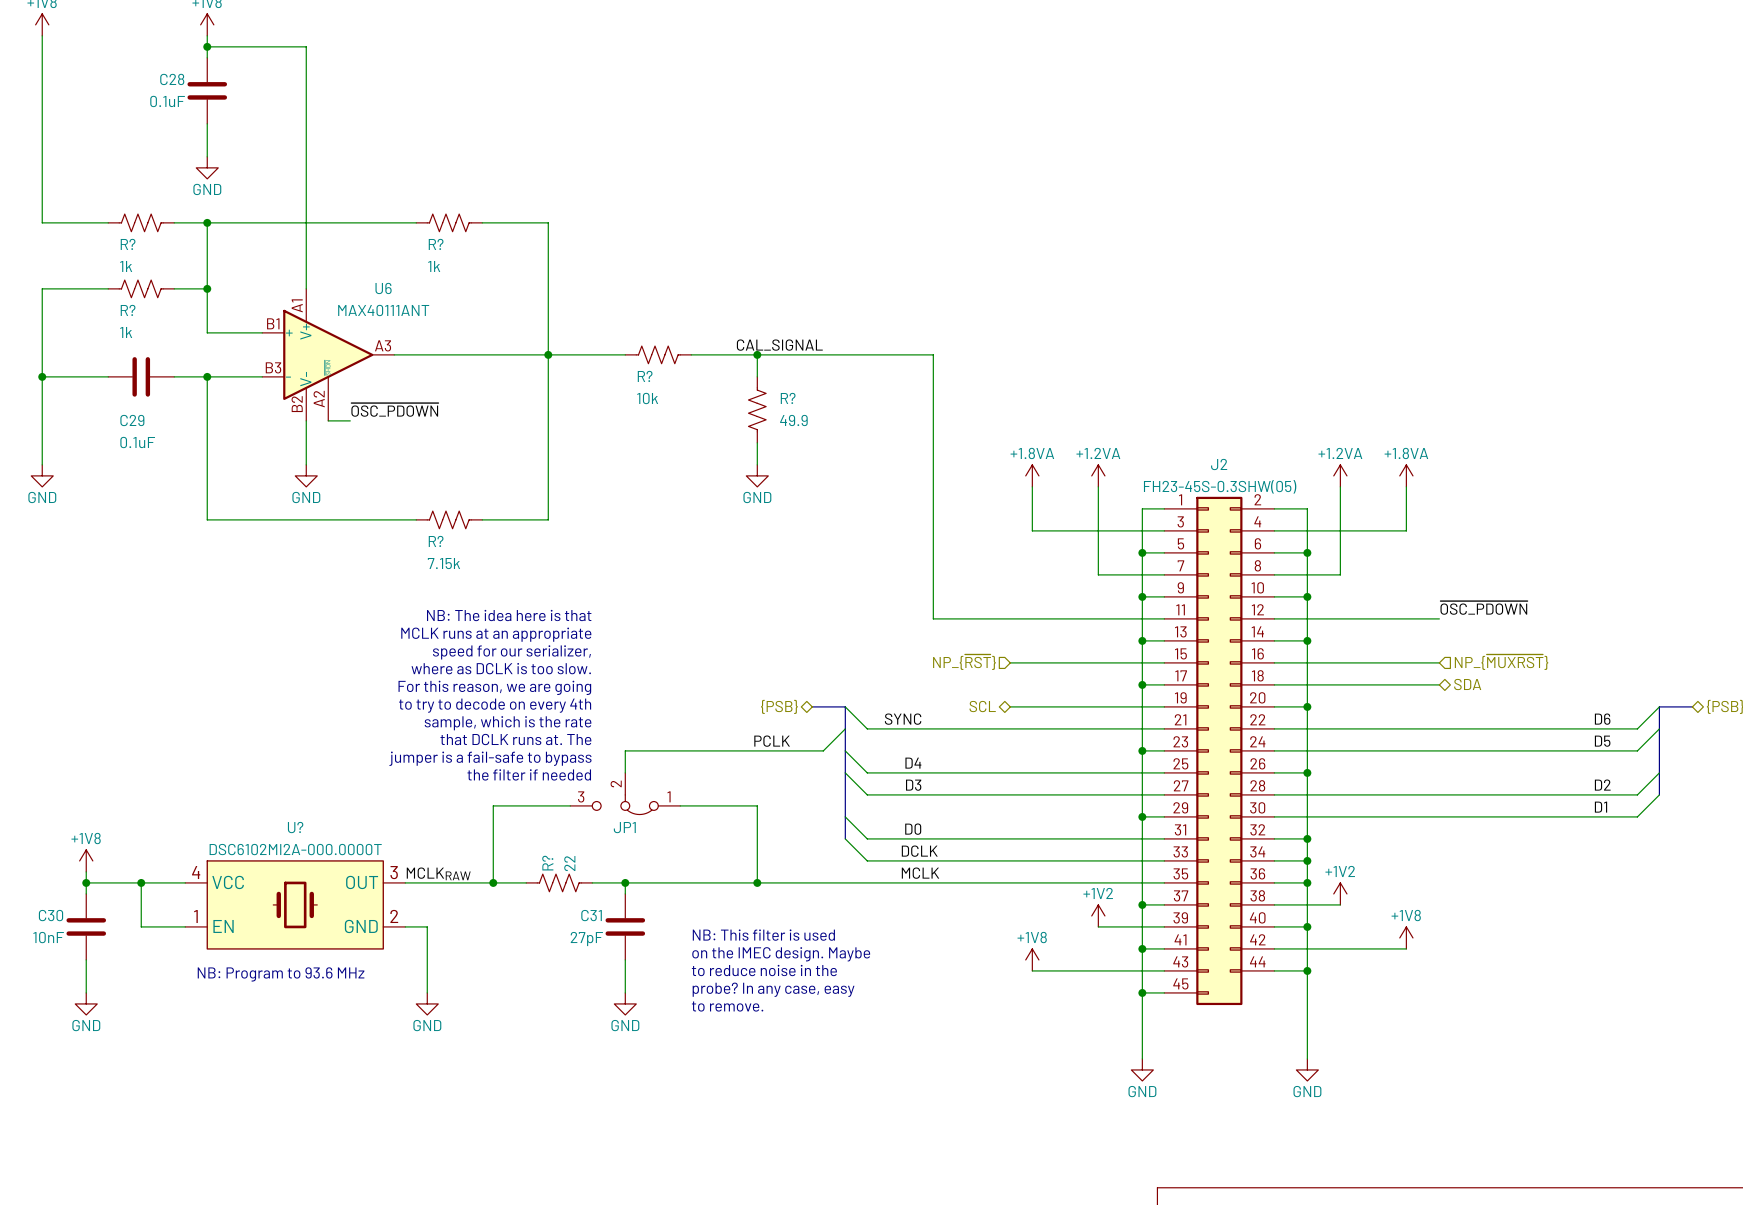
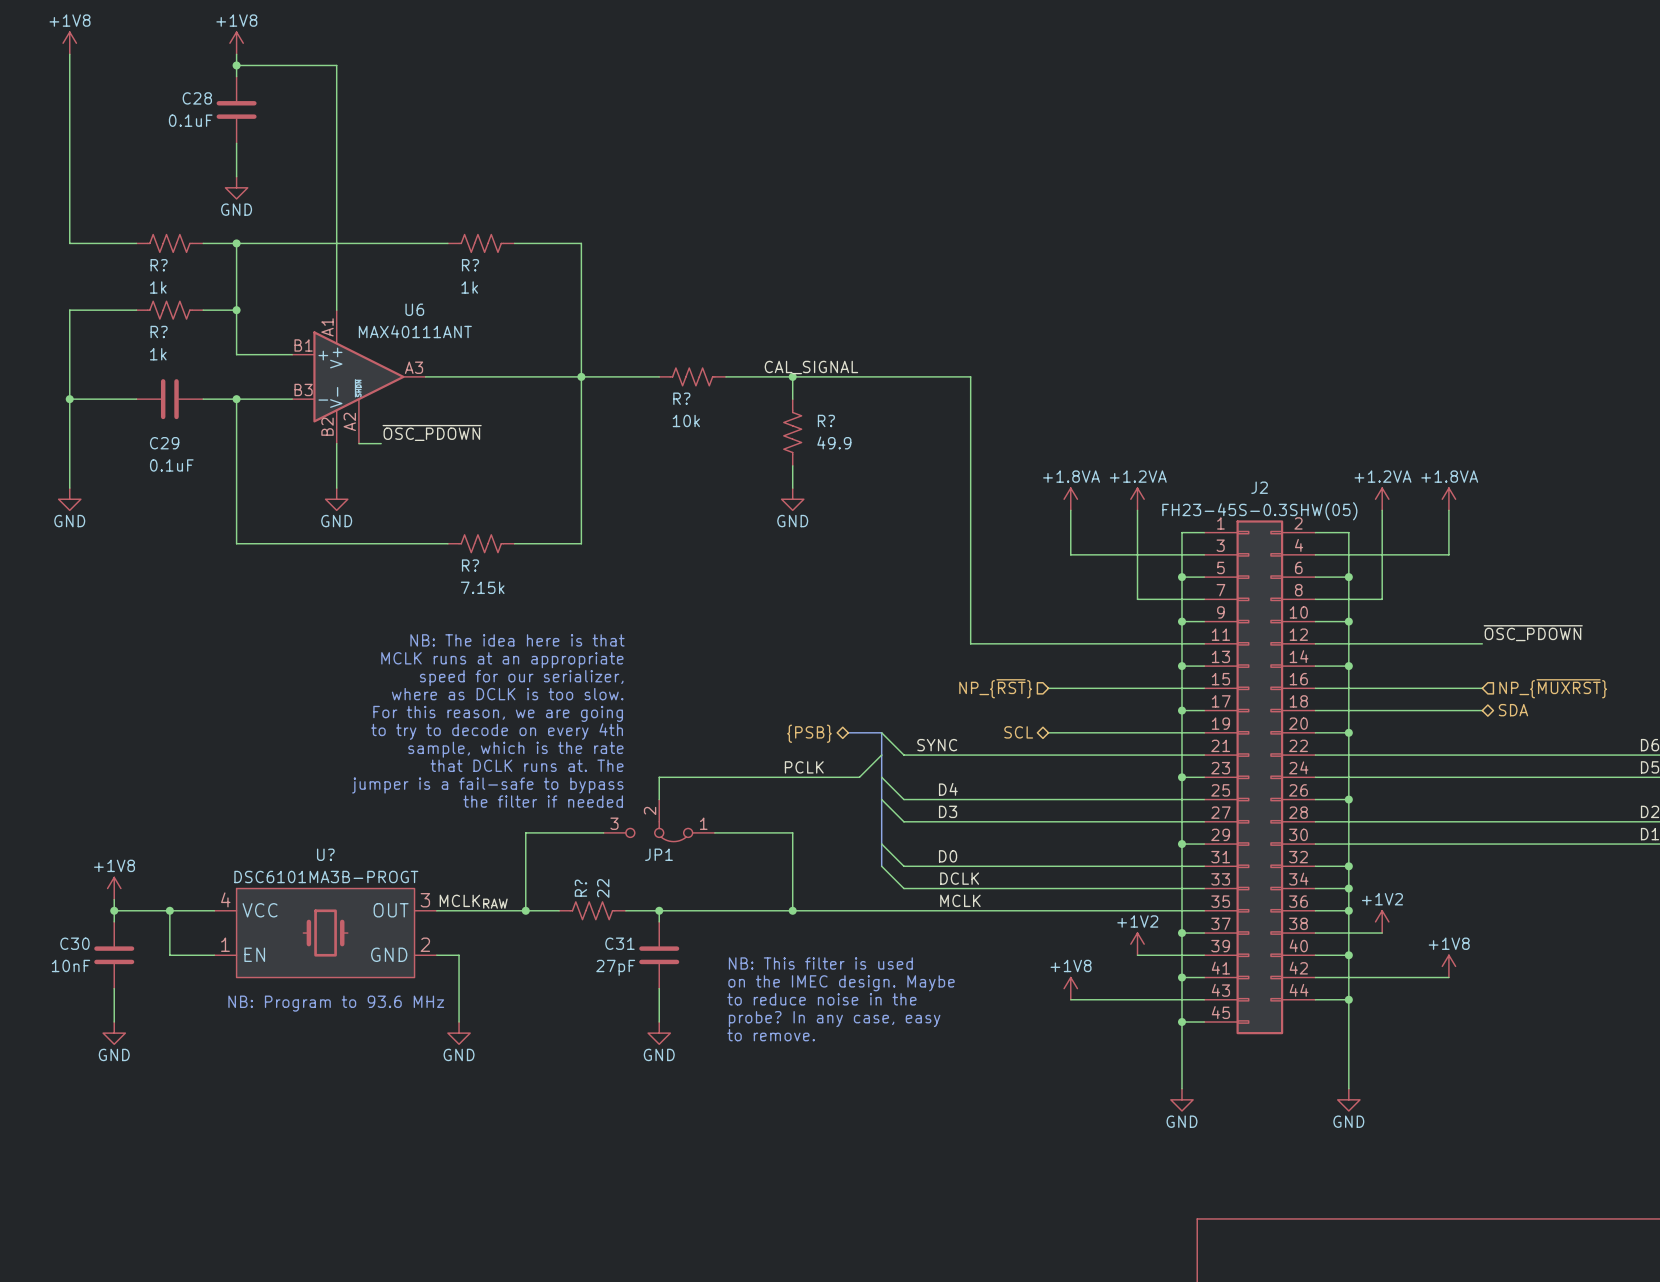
U? value: DSC6102MI2A-000.0000T (295, 849) -> DSC6101MA3B-PROGT (326, 876)

